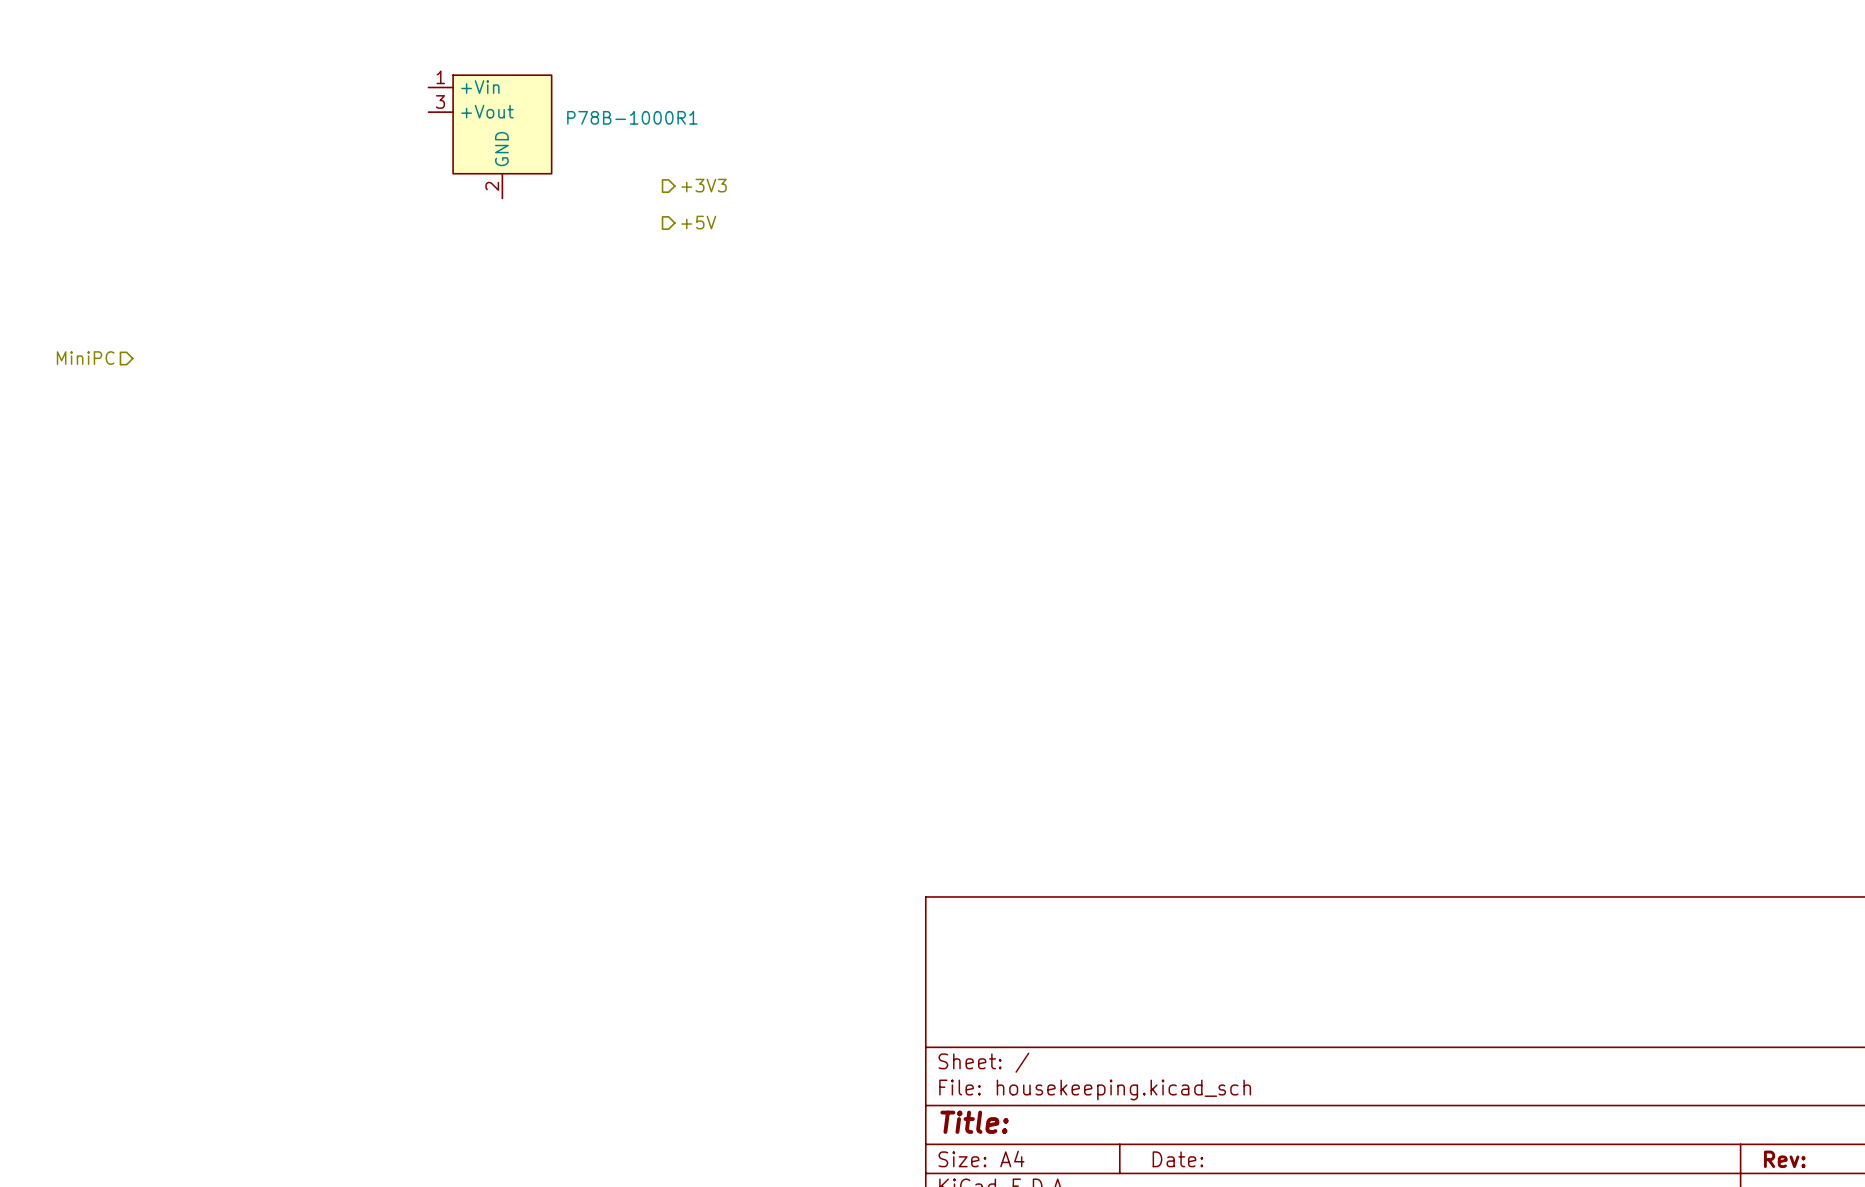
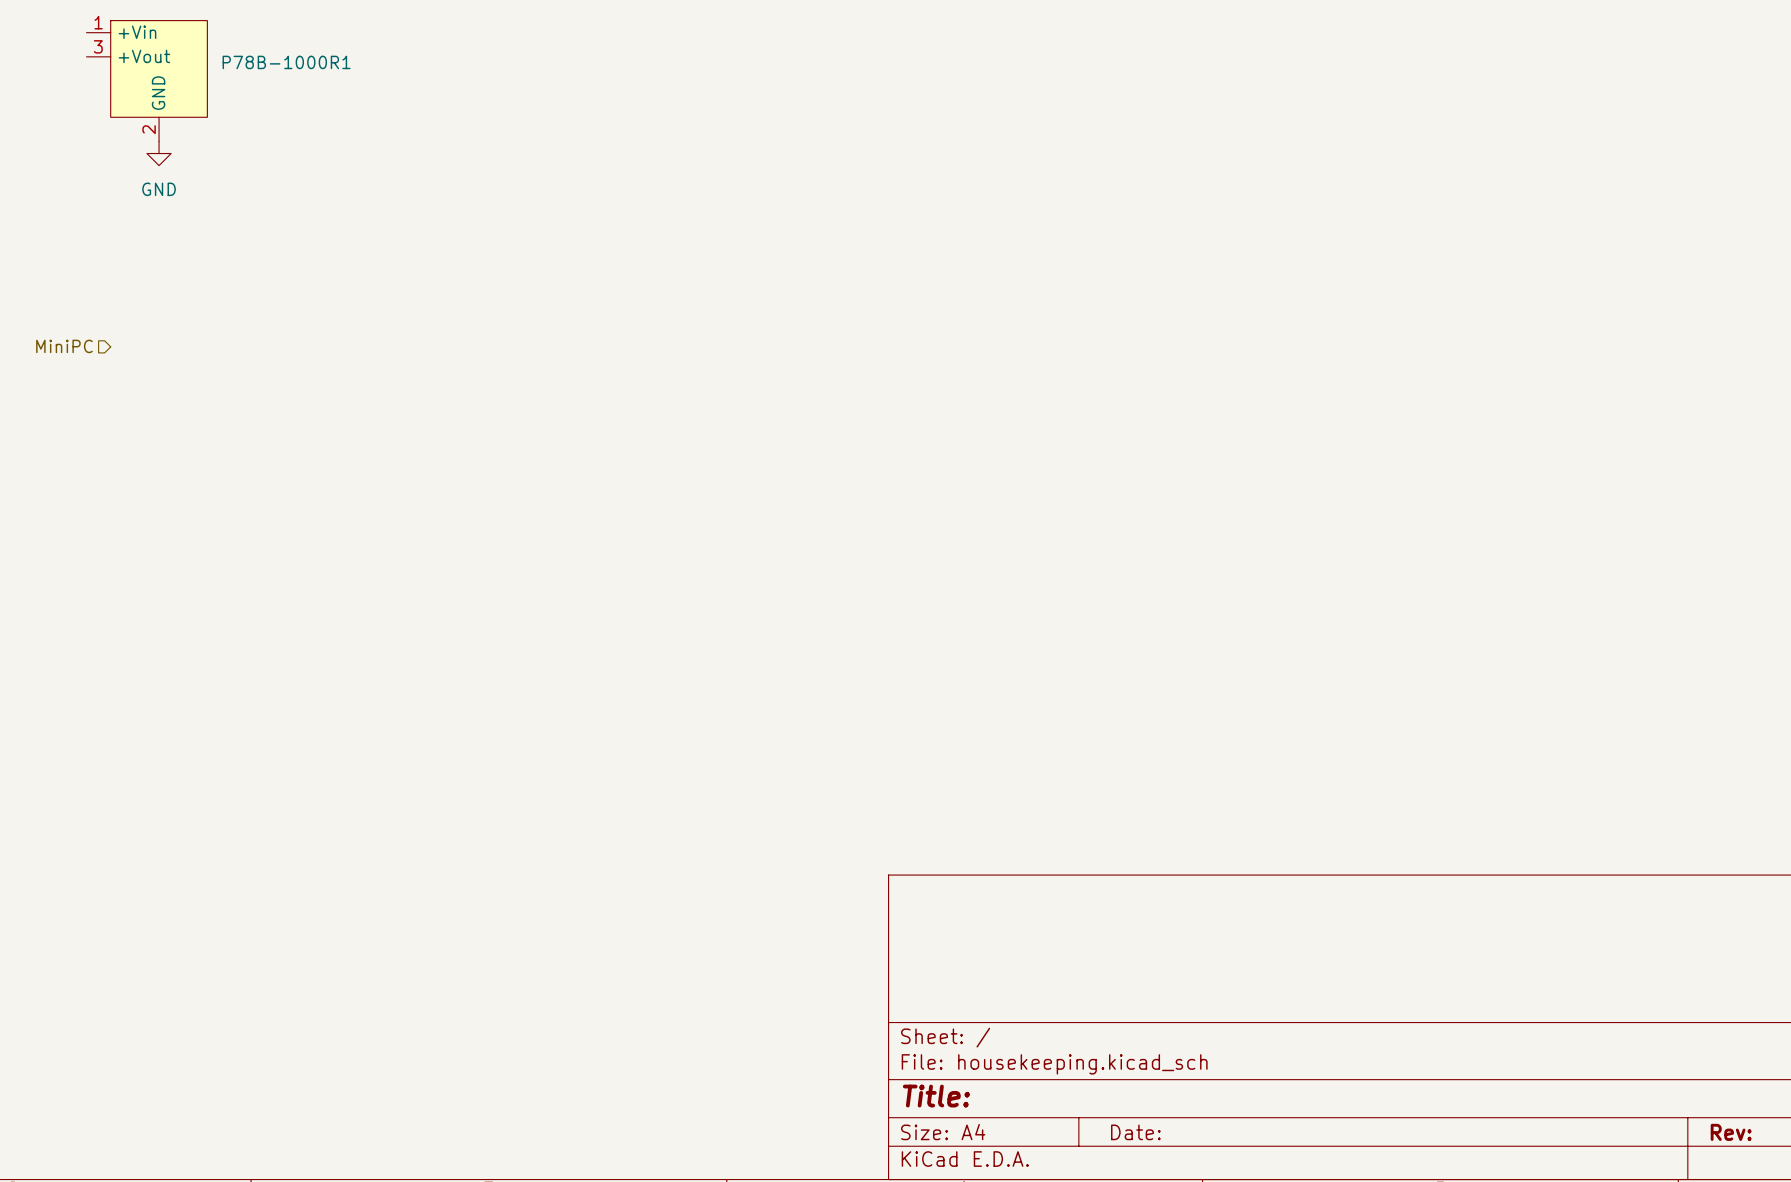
P78B-1000R1 position: (490, 136) -> (146, 81)
power symbol: none -> GND (159, 153)
hierarchical label: +3V3 (704, 185) -> none
hierarchical label: +5V (698, 222) -> none

